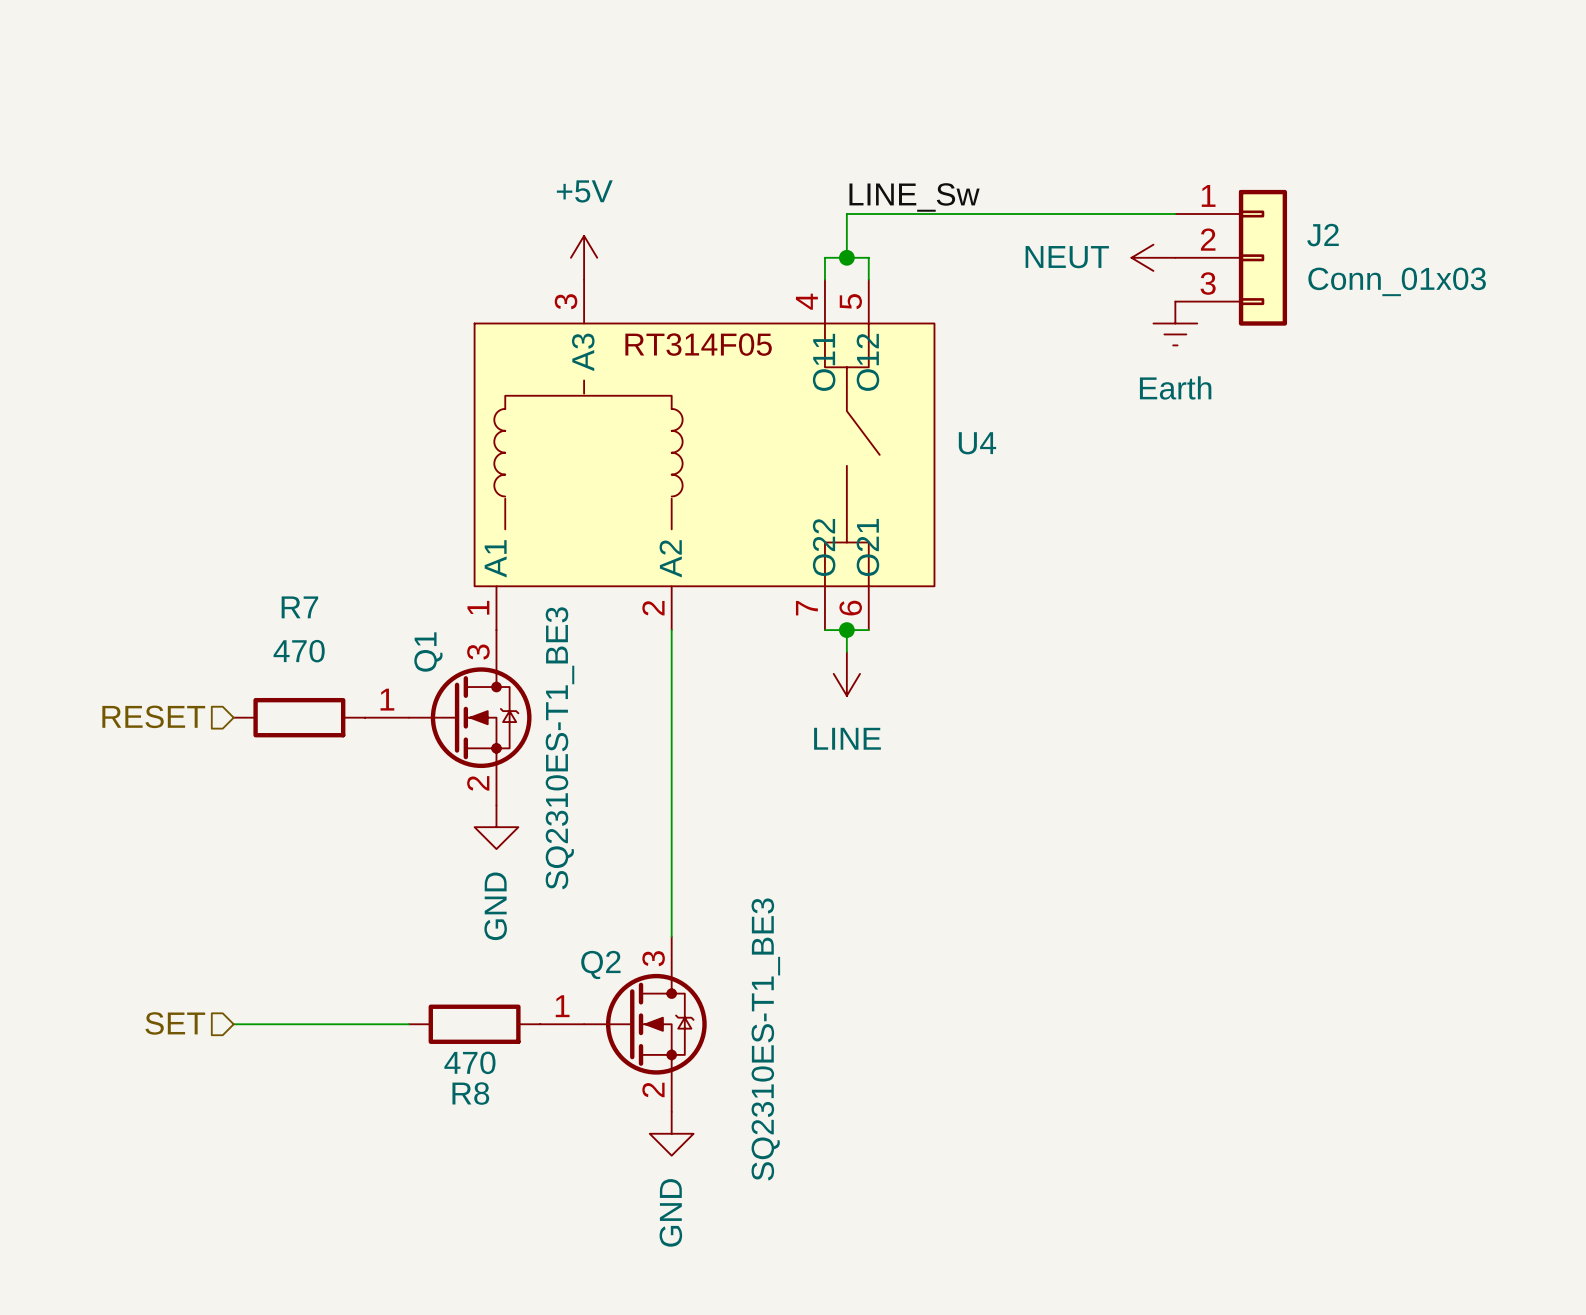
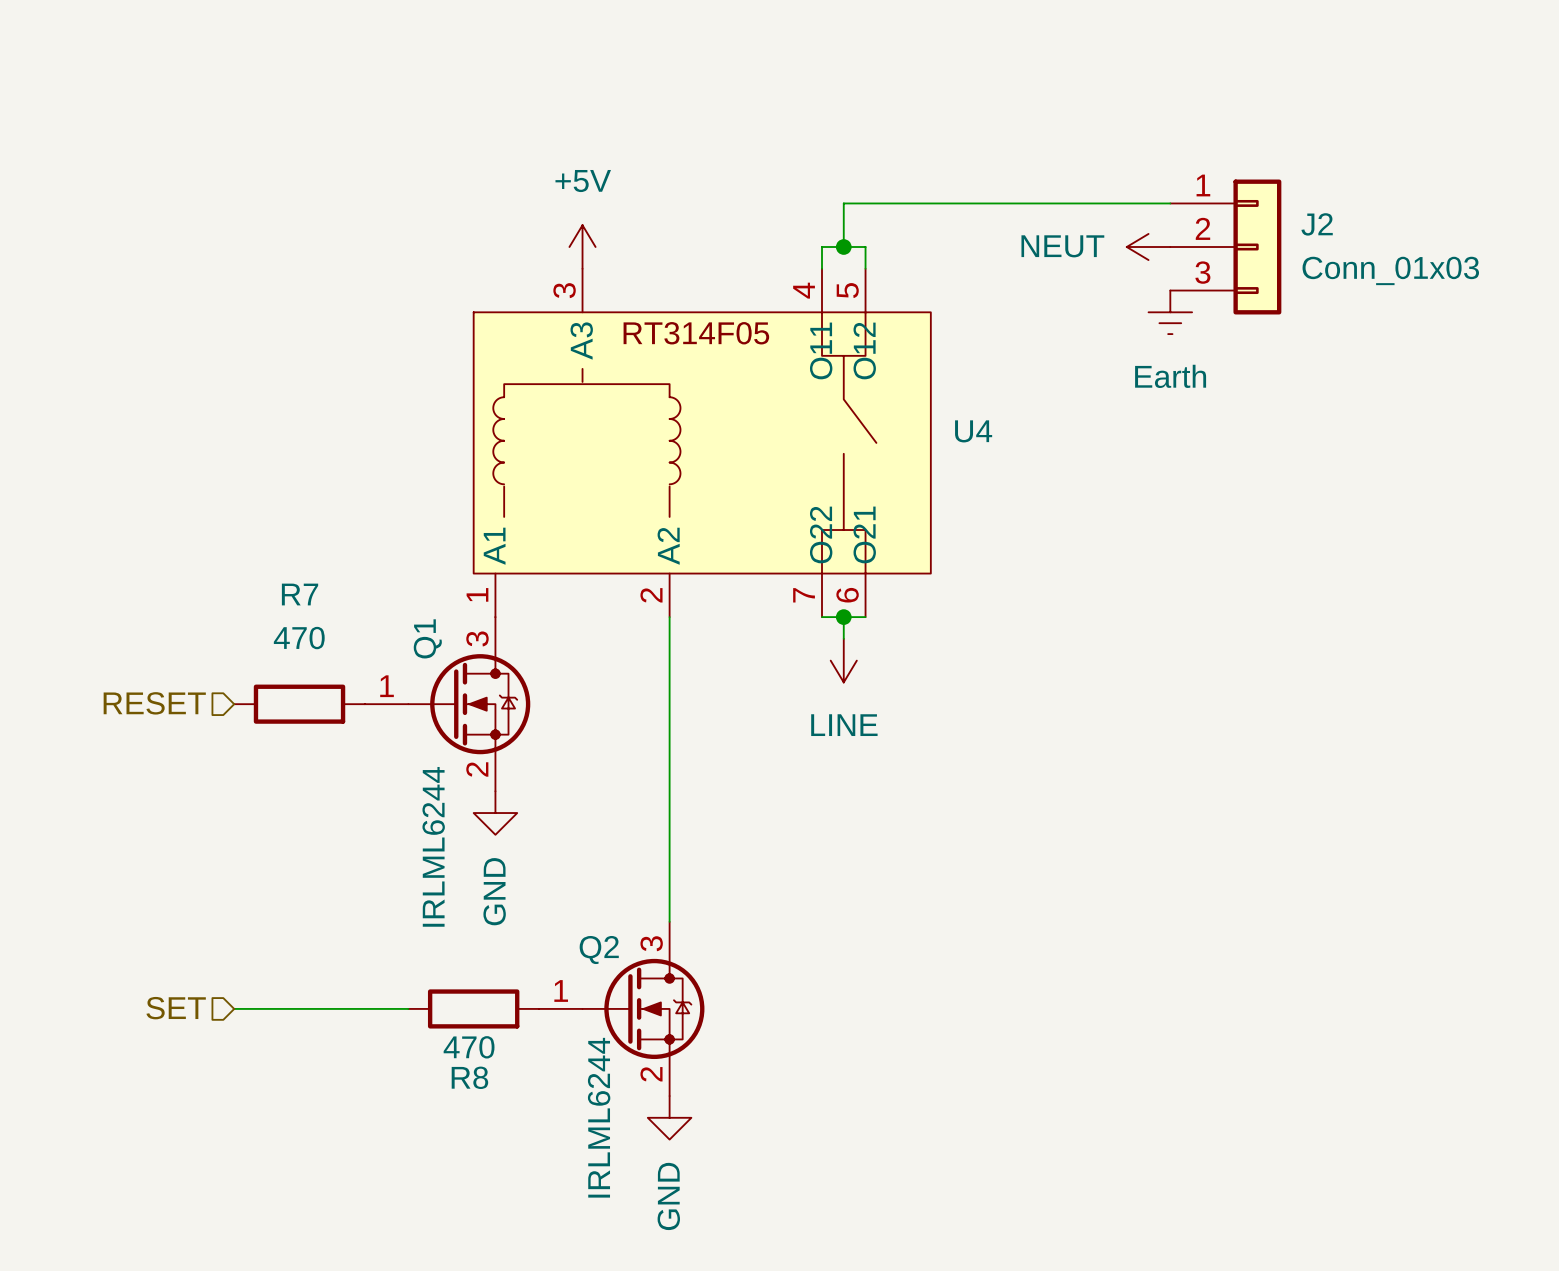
label: LINE_Sw (914, 197) -> none
Q1 value: SQ2310ES-T1_BE3 (559, 748) -> IRLML6244 (433, 846)
Q2 value: SQ2310ES-T1_BE3 (765, 1039) -> IRLML6244 (599, 1117)

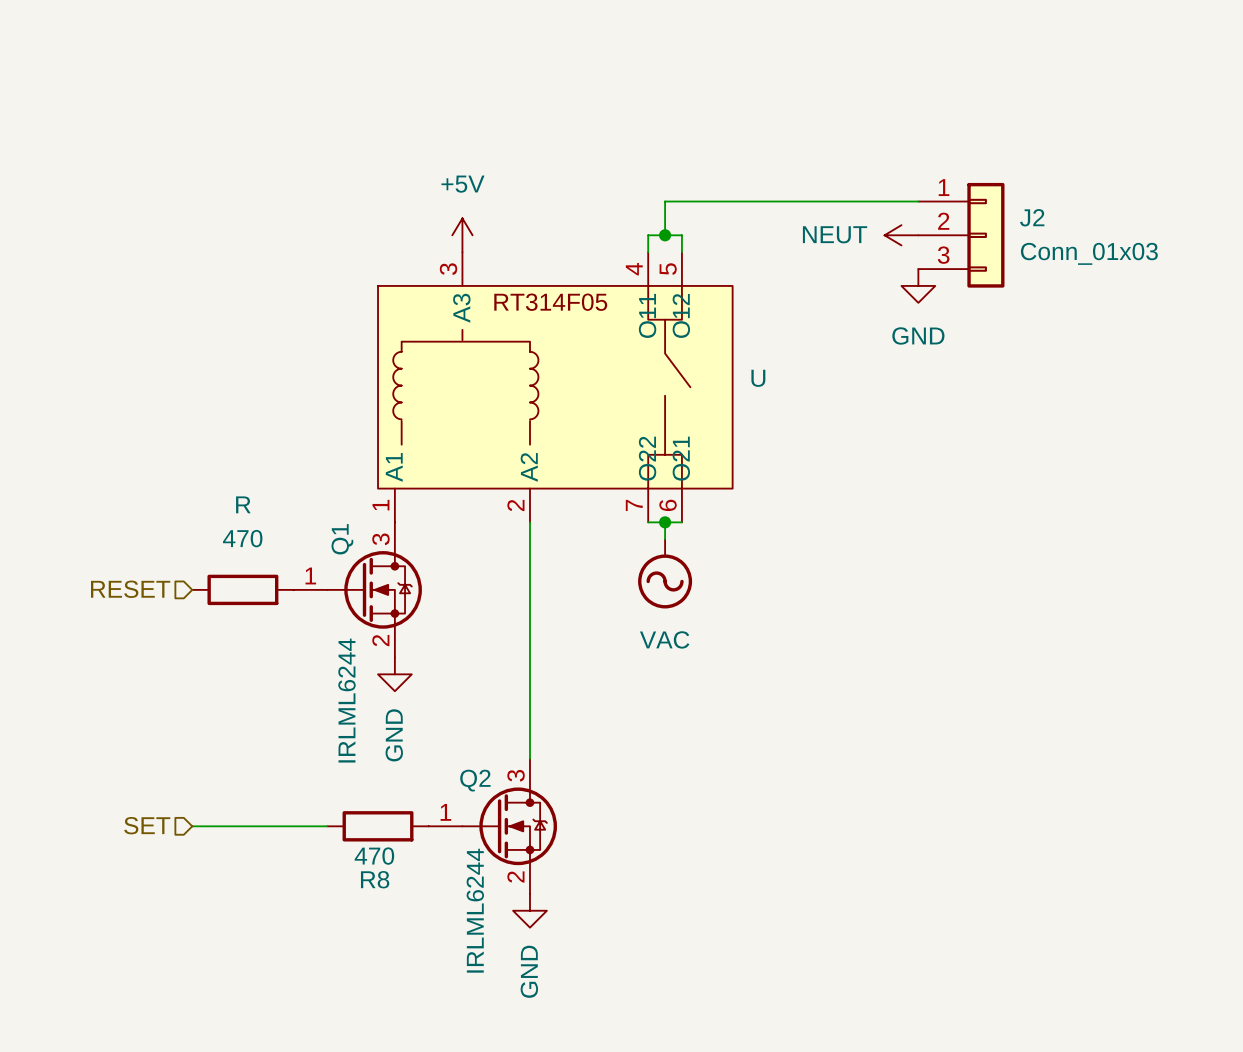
power symbol: Earth (1170, 312) -> GND (918, 285)
U4 name: U4 (973, 431) -> U (758, 378)
R7 name: R7 (300, 594) -> R (243, 504)
power symbol: LINE (843, 660) -> none
power symbol: none -> VAC (665, 573)

